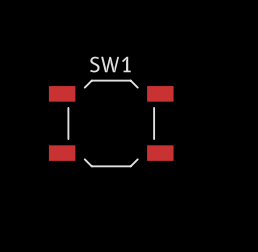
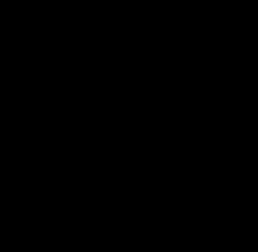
SW1: (111, 123) -> none

